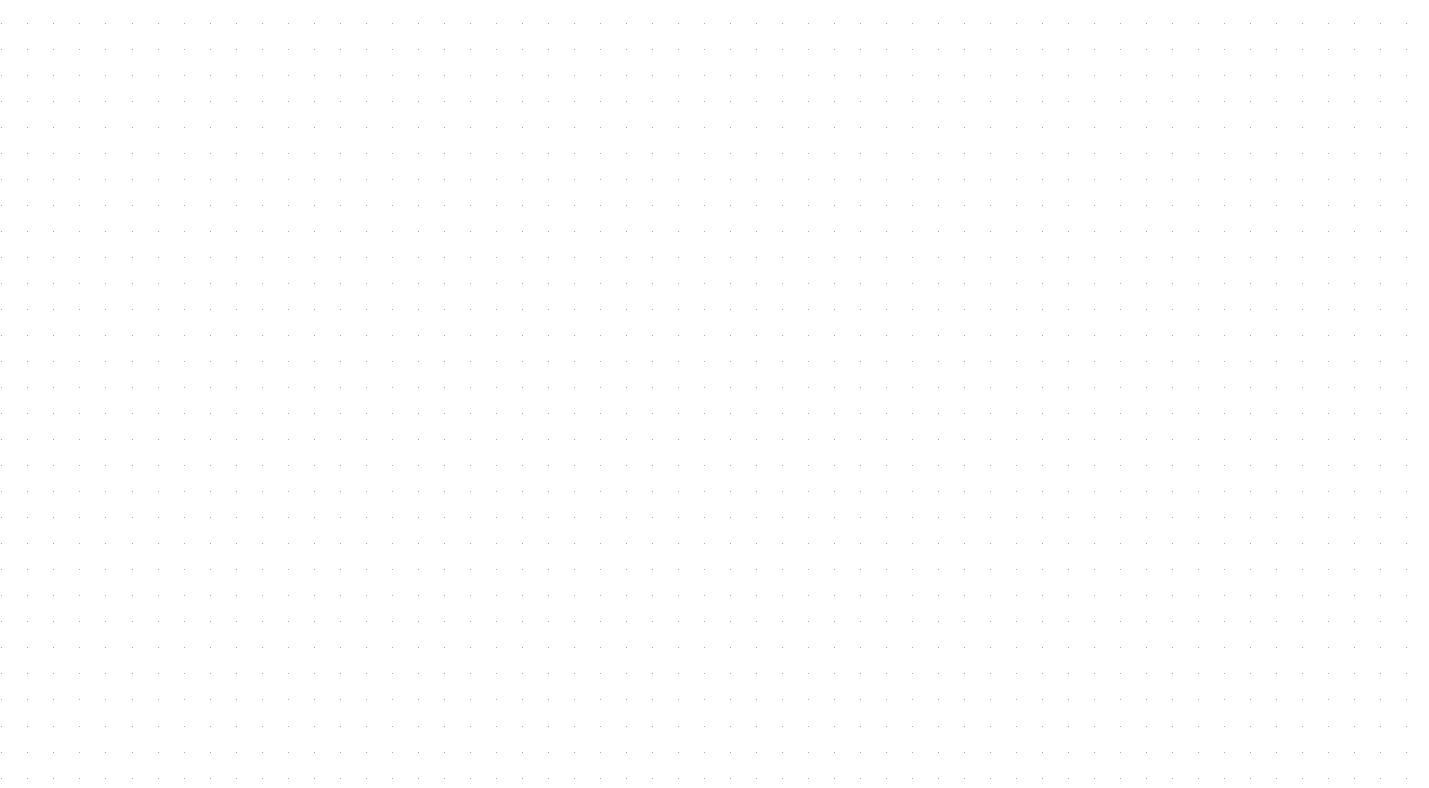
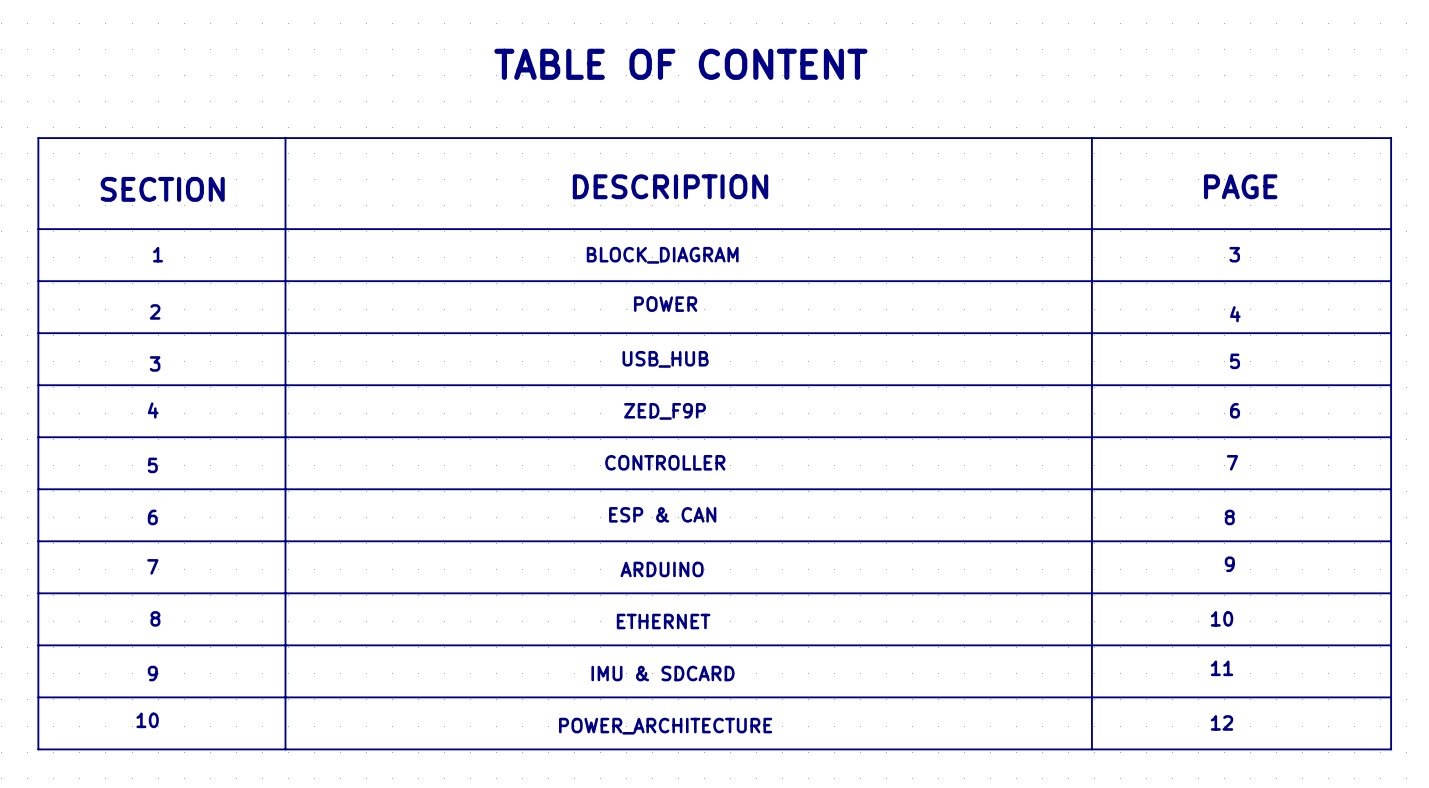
text: none -> TABLE OF CONTENT (680, 64)
line: none -> (38, 138) (1391, 138) (1391, 749) (38, 749) (38, 138)
line: none -> (285, 138) (285, 749)
line: none -> (1091, 138) (1091, 749)
text: none -> DESCRIPTION (670, 186)
text: none -> PAGE (1240, 186)
text: none -> SECTION (162, 189)
line: none -> (38, 229) (1391, 229)
text: none -> 1 (158, 254)
text: none -> 3 (1234, 254)
text: none -> BLOCK_DIAGRAM (662, 255)
line: none -> (38, 281) (1391, 281)
text: none -> POWER (665, 304)
text: none -> 2 (155, 311)
text: none -> 4 (1235, 314)
line: none -> (38, 333) (1391, 333)
text: none -> USB_HUB (665, 359)
text: none -> 5 (1235, 361)
text: none -> 3 (155, 363)
line: none -> (38, 385) (1391, 385)
text: none -> 4 (153, 410)
text: none -> 6 (1235, 410)
text: none -> ZED_F9P (664, 411)
line: none -> (38, 437) (1391, 437)
text: none -> CONTROLLER (665, 462)
text: none -> 7 (1232, 462)
text: none -> 5 (152, 465)
line: none -> (38, 489) (1391, 489)
text: none -> ESP & CAN (662, 514)
text: none -> 6 (152, 517)
text: none -> 8 (1229, 517)
line: none -> (38, 541) (1391, 541)
text: none -> 9 (1229, 564)
text: none -> 7 (152, 566)
text: none -> ARDUINO (662, 569)
line: none -> (38, 593) (1391, 593)
text: none -> 8 (155, 618)
text: none -> 10 (1222, 618)
text: none -> ETHERNET (663, 621)
line: none -> (38, 645) (1391, 645)
text: none -> 11 (1222, 668)
text: none -> 9 (152, 673)
text: none -> IMU & SDCARD (663, 673)
line: none -> (38, 697) (1391, 697)
text: none -> 10 (147, 720)
text: none -> 12 (1222, 722)
text: none -> POWER_ARCHITECTURE (665, 726)

